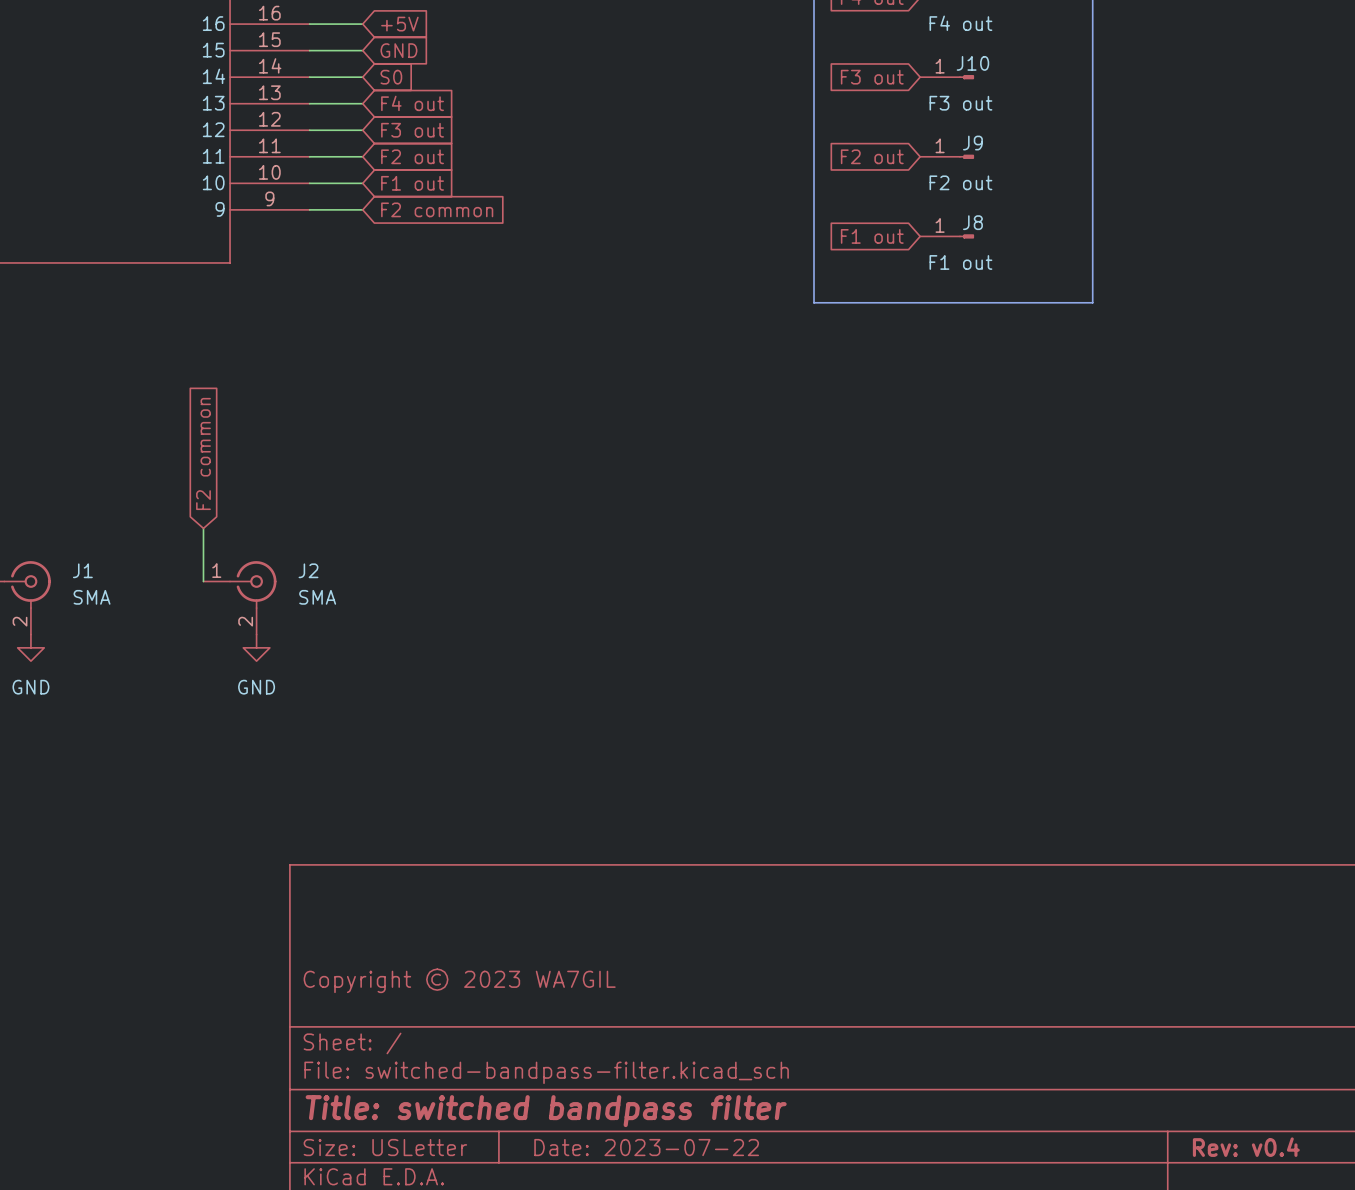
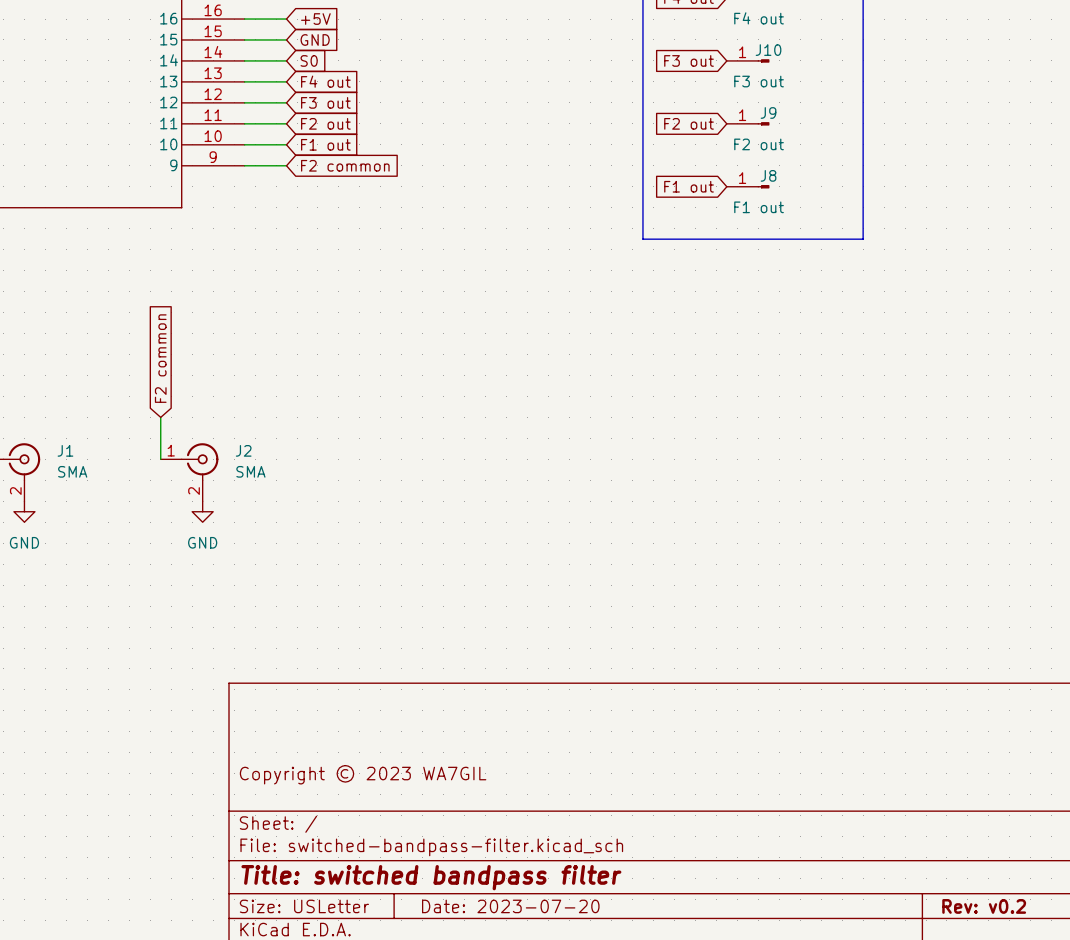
title block: Date: 2023-07-22 (646, 1147) -> Date: 2023-07-20 (510, 906)
title block: Rev: v0.4 (1246, 1147) -> Rev: v0.2 (984, 906)

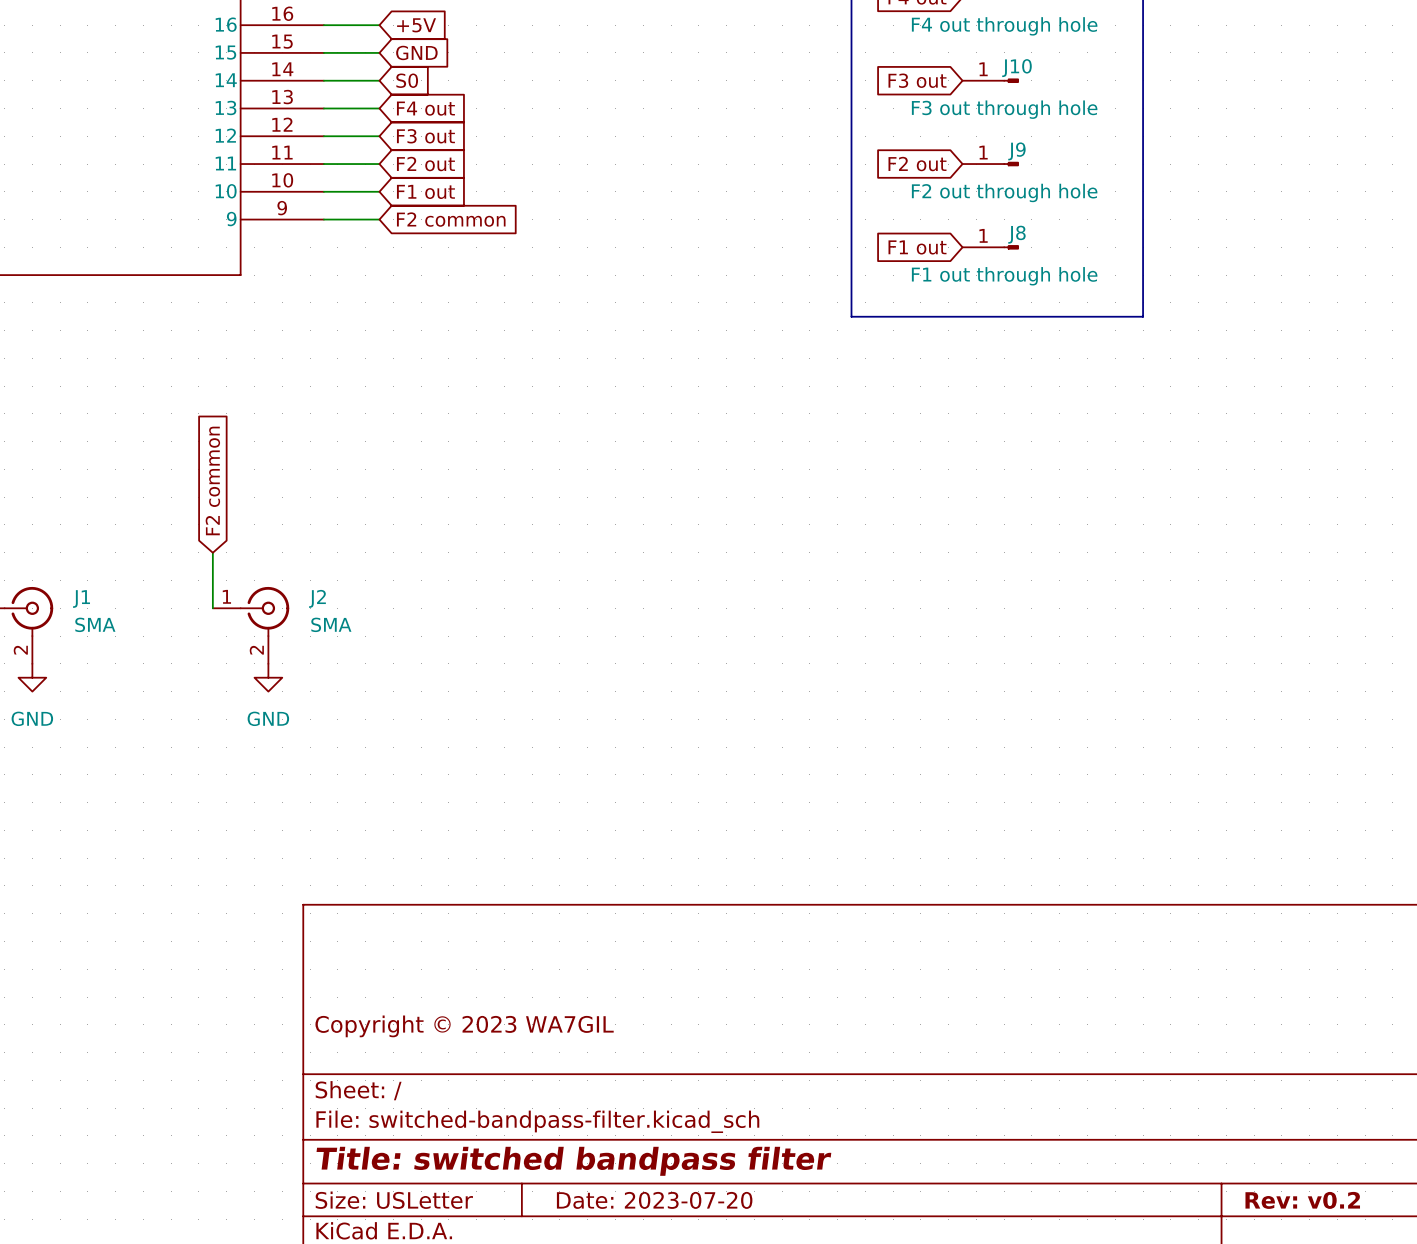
part value: F4 out (759, 18) -> F4 out through hole (1004, 26)
J10 value: F3 out (759, 81) -> F3 out through hole (1004, 109)
J9 value: F2 out (759, 144) -> F2 out through hole (1004, 192)
J8 value: F1 out (759, 207) -> F1 out through hole (1004, 276)

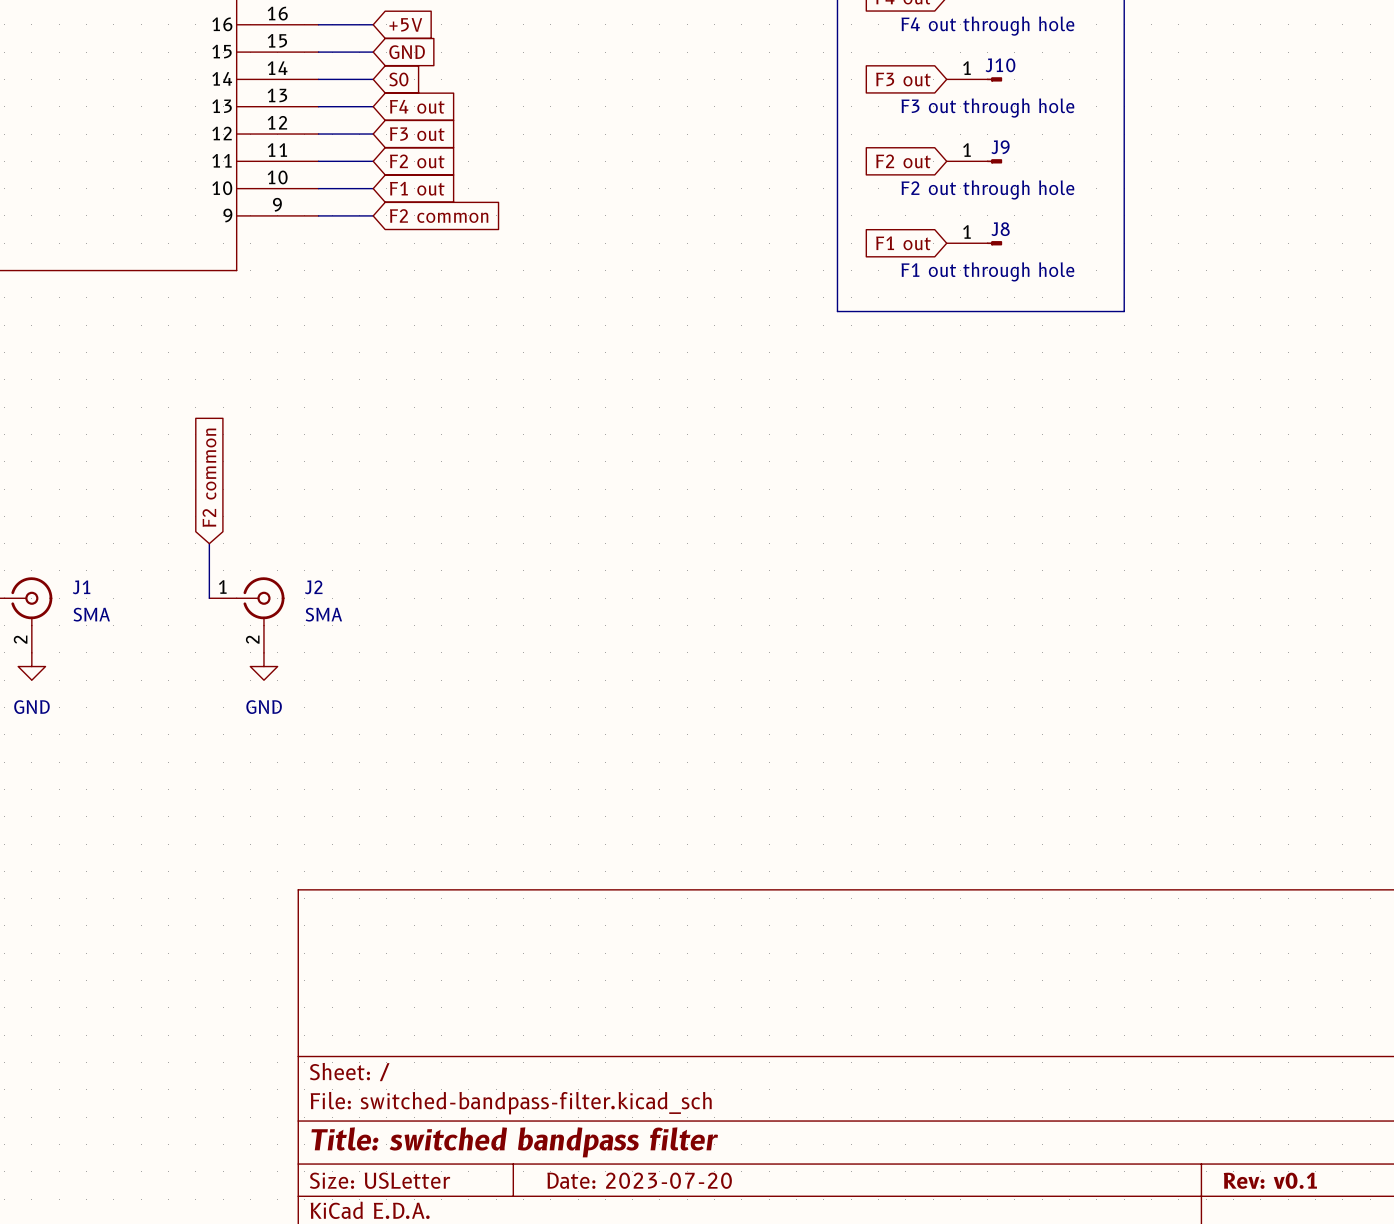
title block: Copyright © 2023 WA7GIL (464, 1026) -> none
title block: Rev: v0.2 (1302, 1200) -> Rev: v0.1 (1270, 1180)

